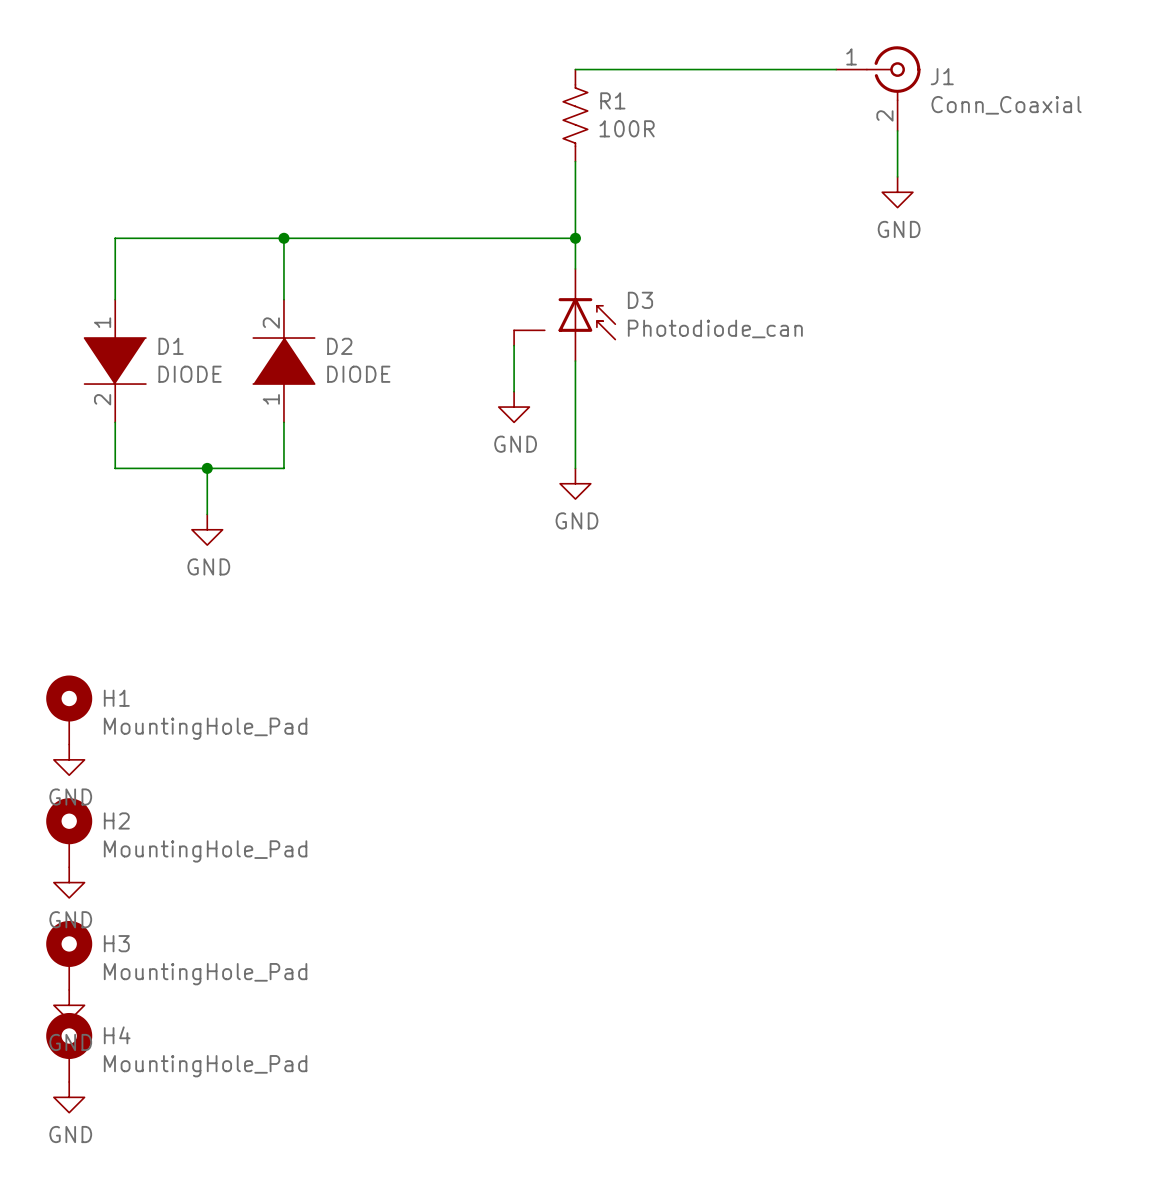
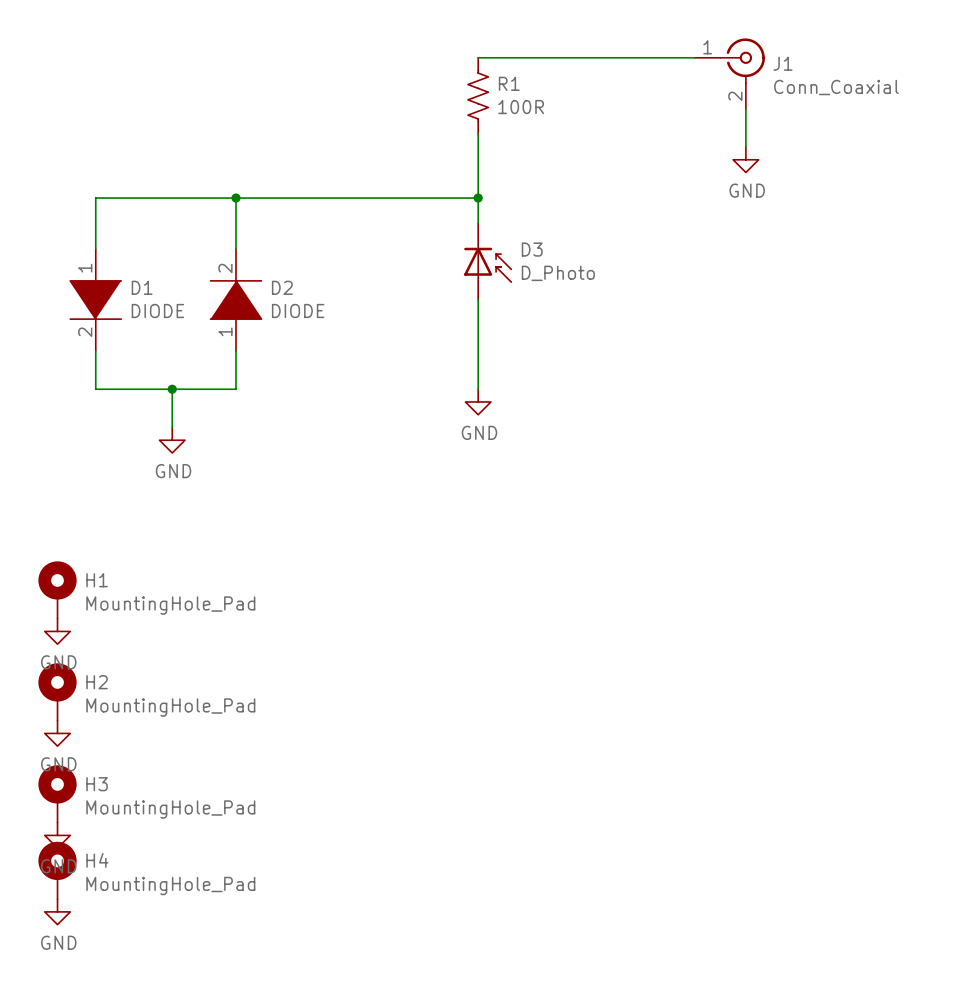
D3 symbol: [514, 268, 616, 362] -> [464, 223, 512, 301]
D3 value: Photodiode_can (715, 328) -> D_Photo (558, 273)
wire: (514, 345) (514, 391) -> none
power symbol: GND (514, 407) -> none

